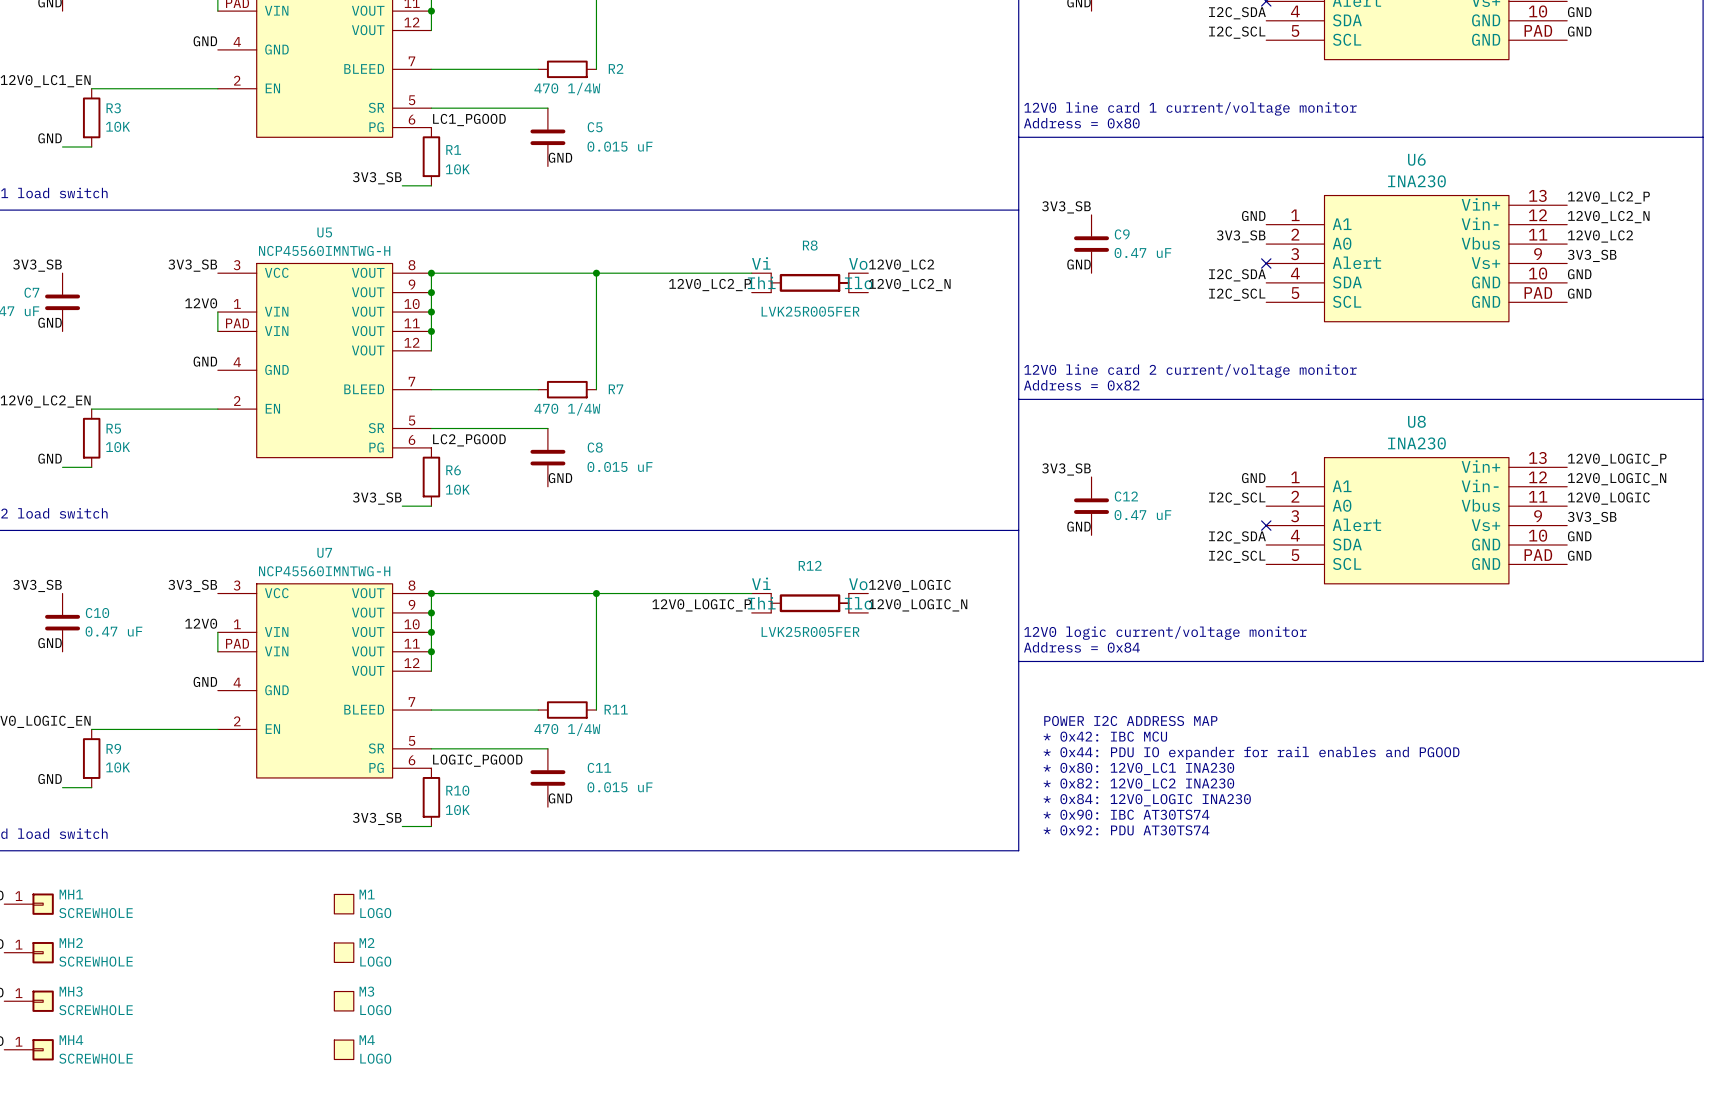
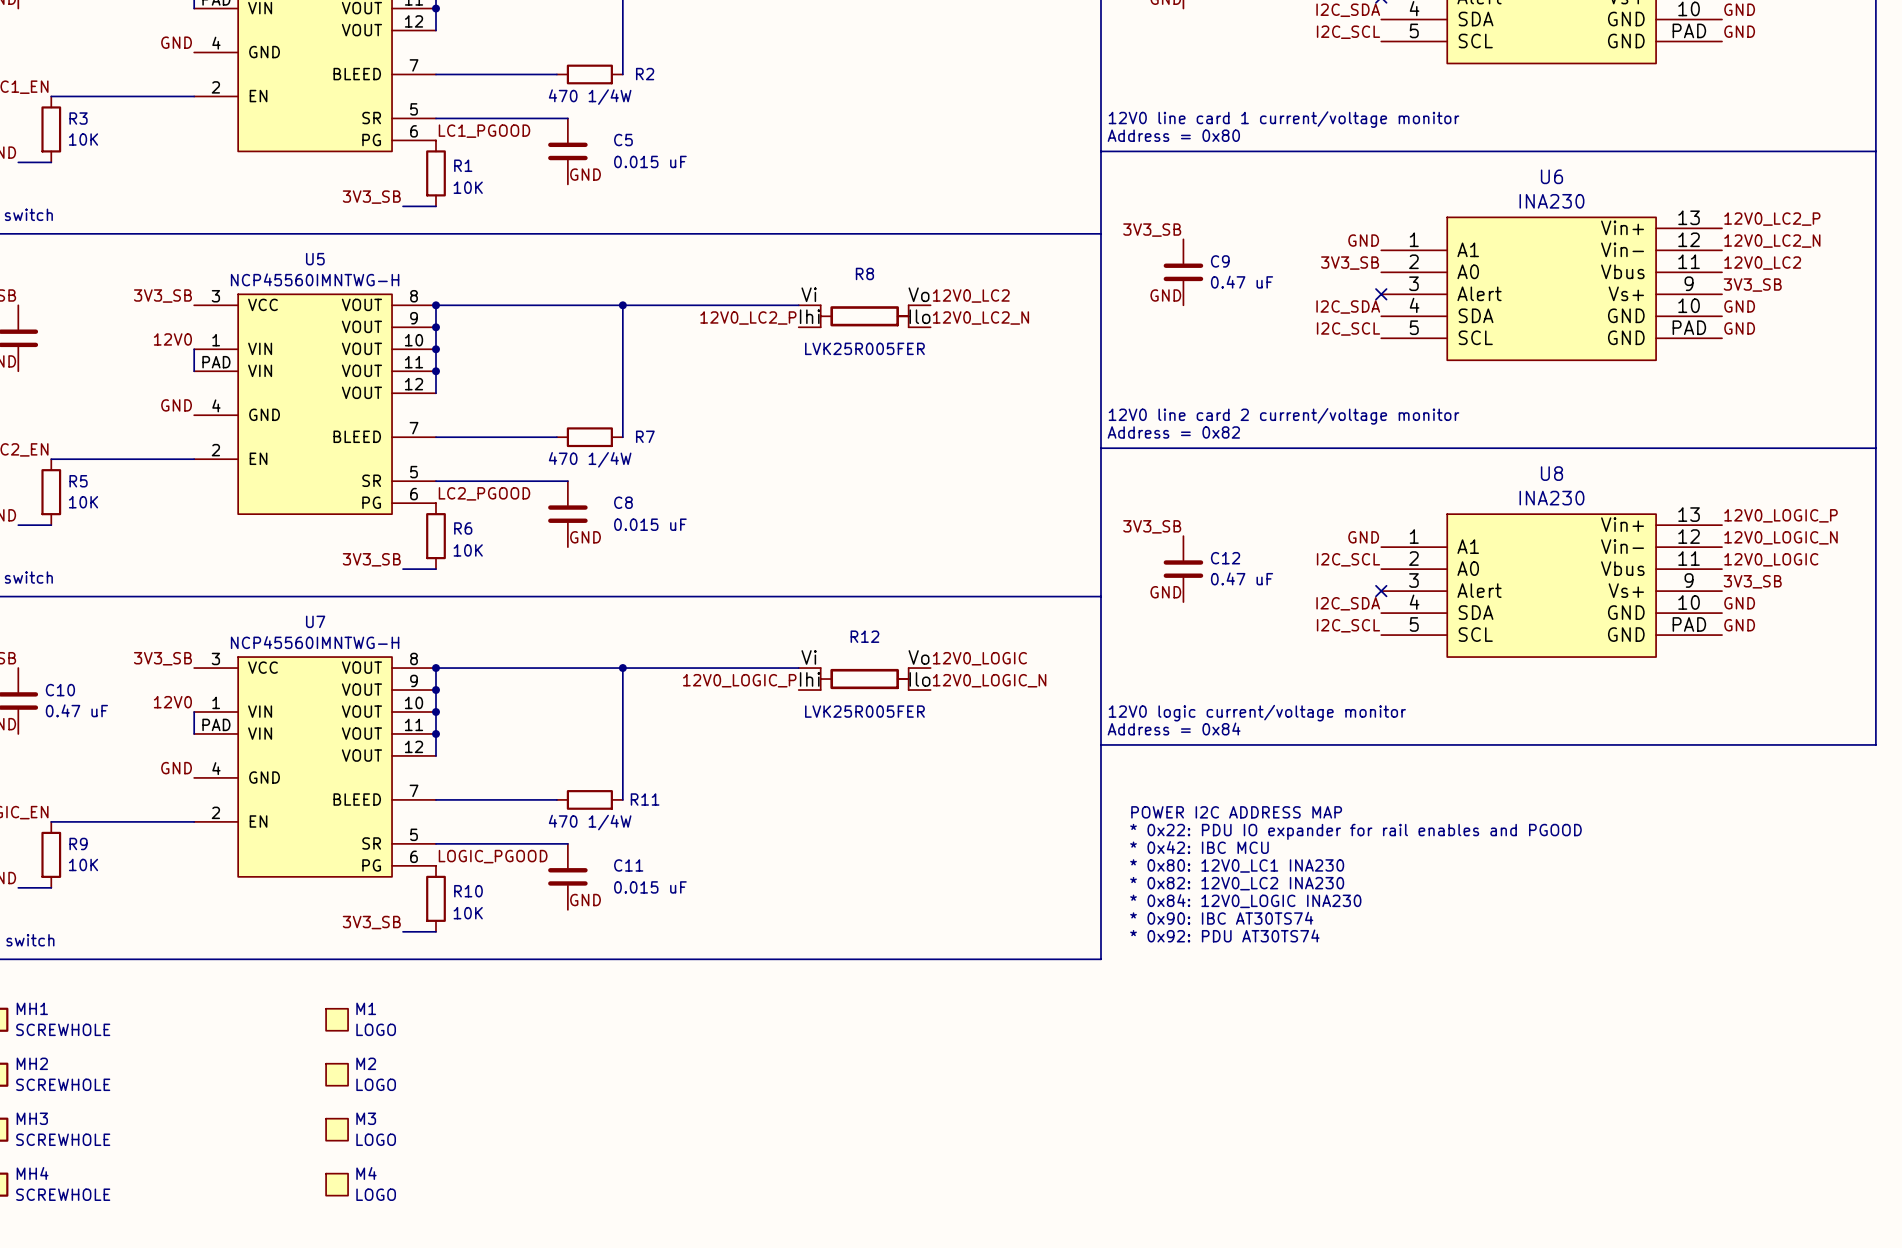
text: * 0x42: IBC MCU (1105, 736) -> * 0x22: PDU IO expander for rail enables and PGOOD (1355, 831)
text: * 0x44: PDU IO expander for rail enables and PGOOD (1251, 753) -> * 0x42: IBC MCU (1199, 847)

